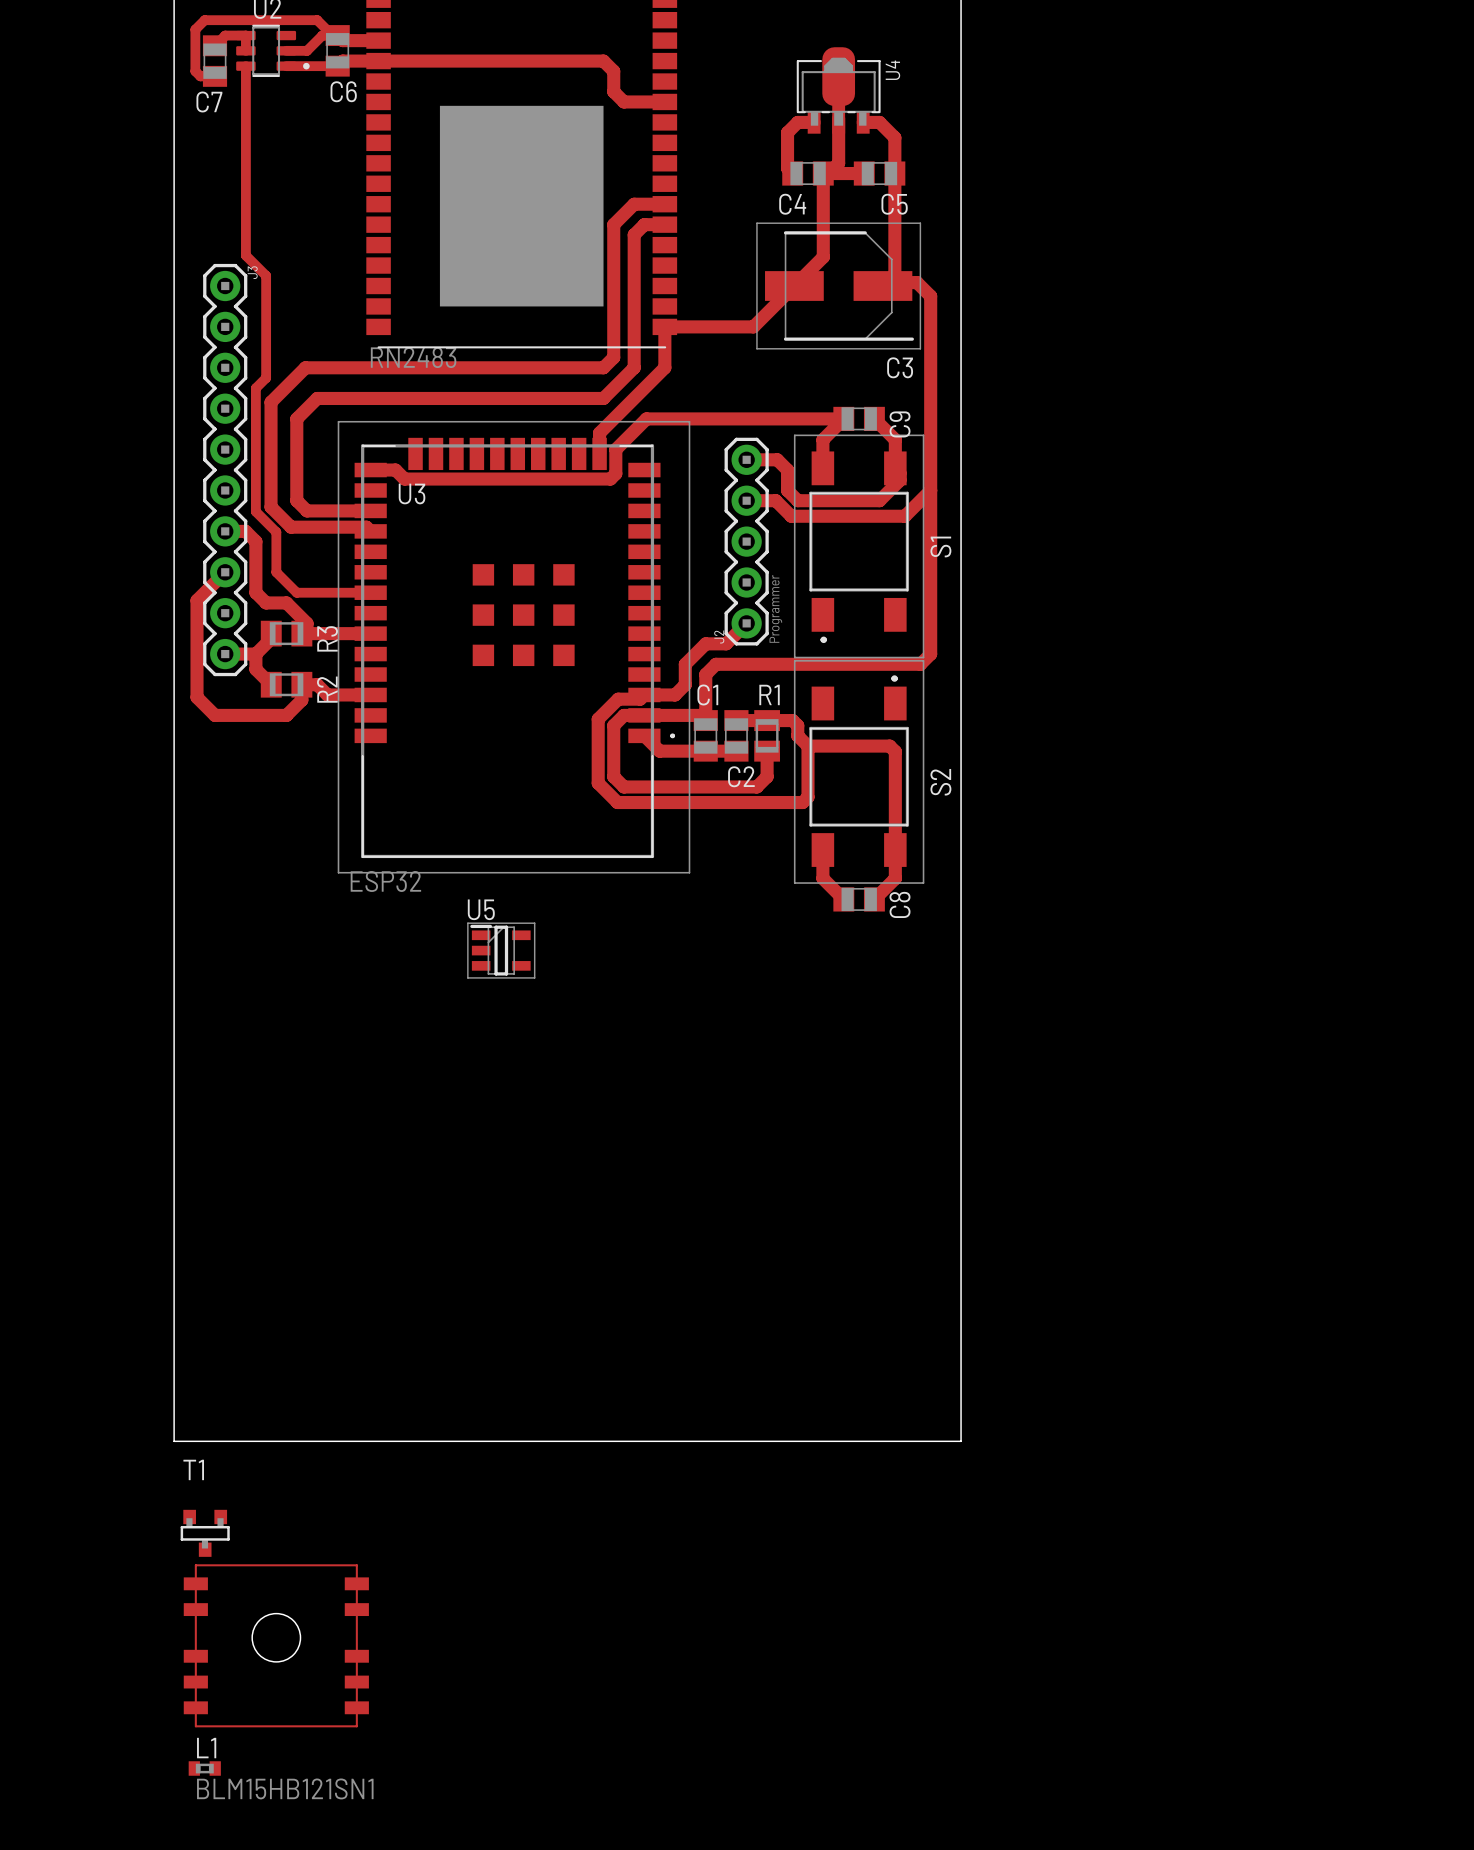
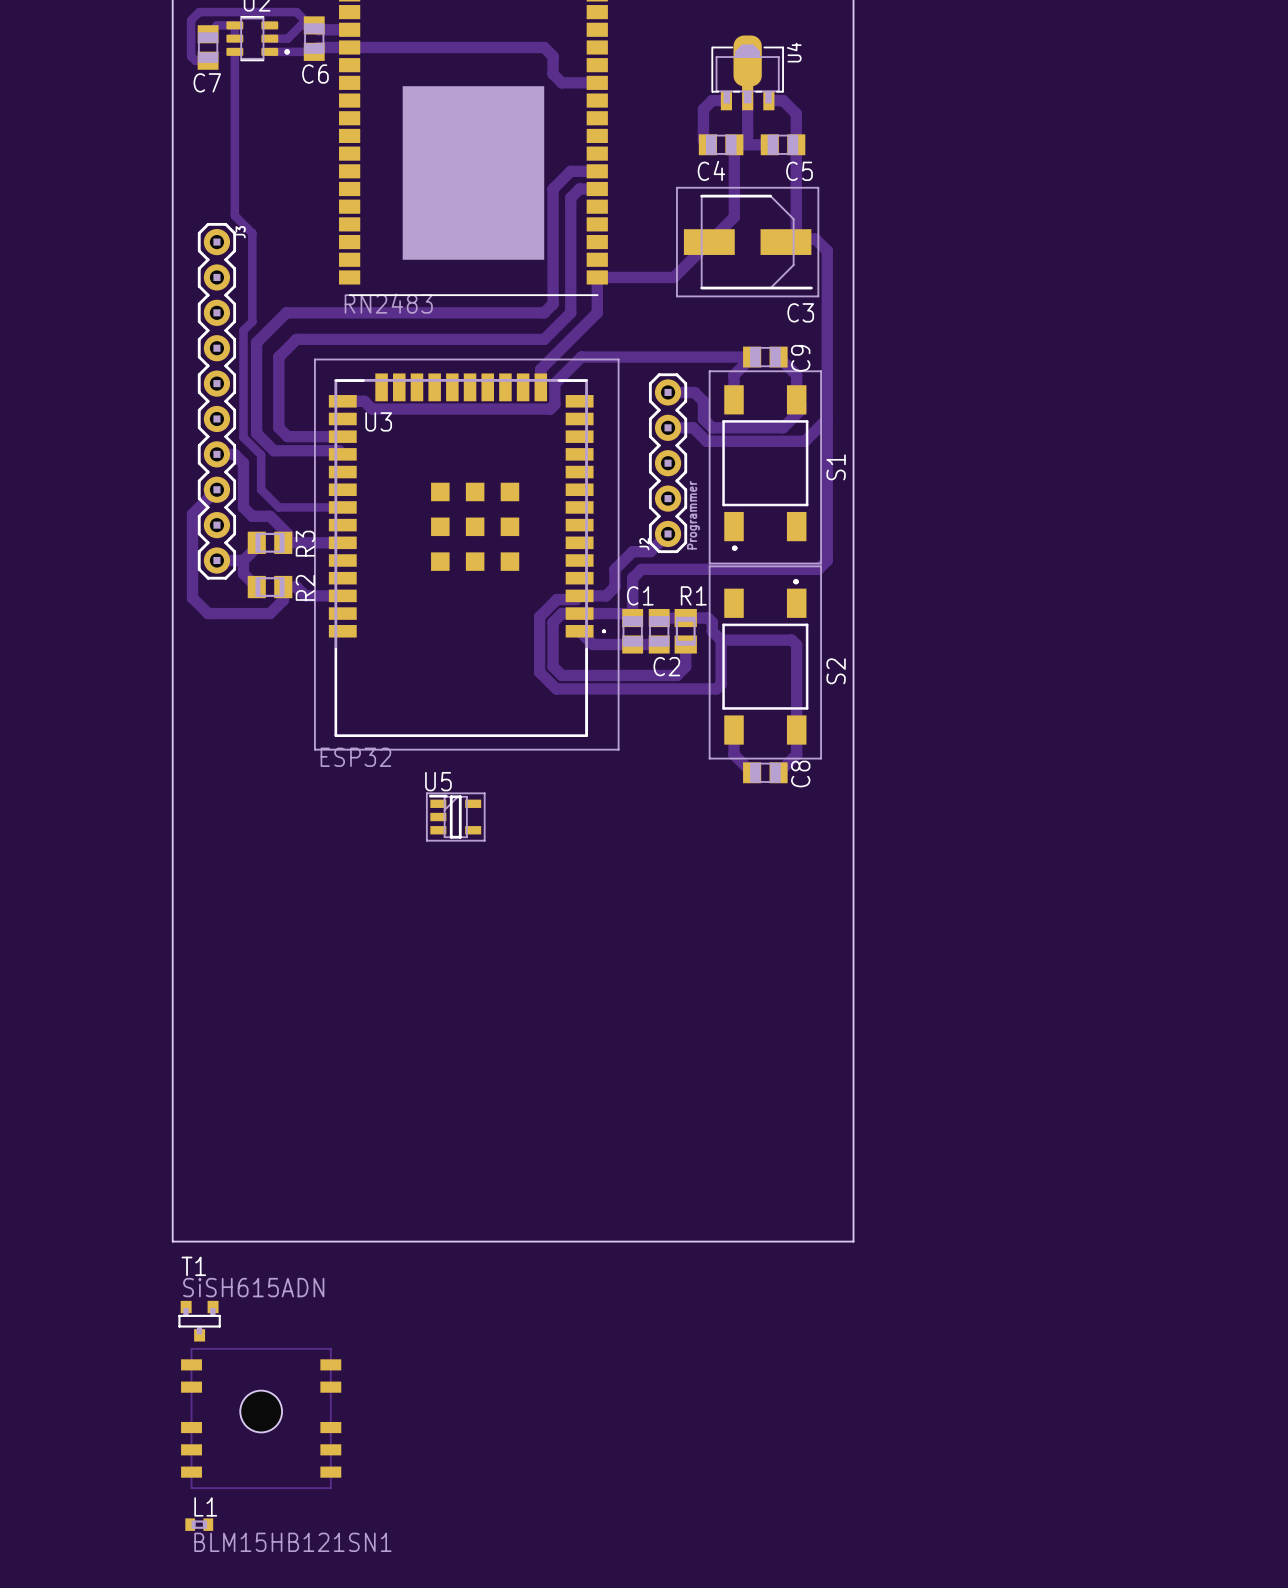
T1 value: none -> SiSH615ADN (253, 1287)

